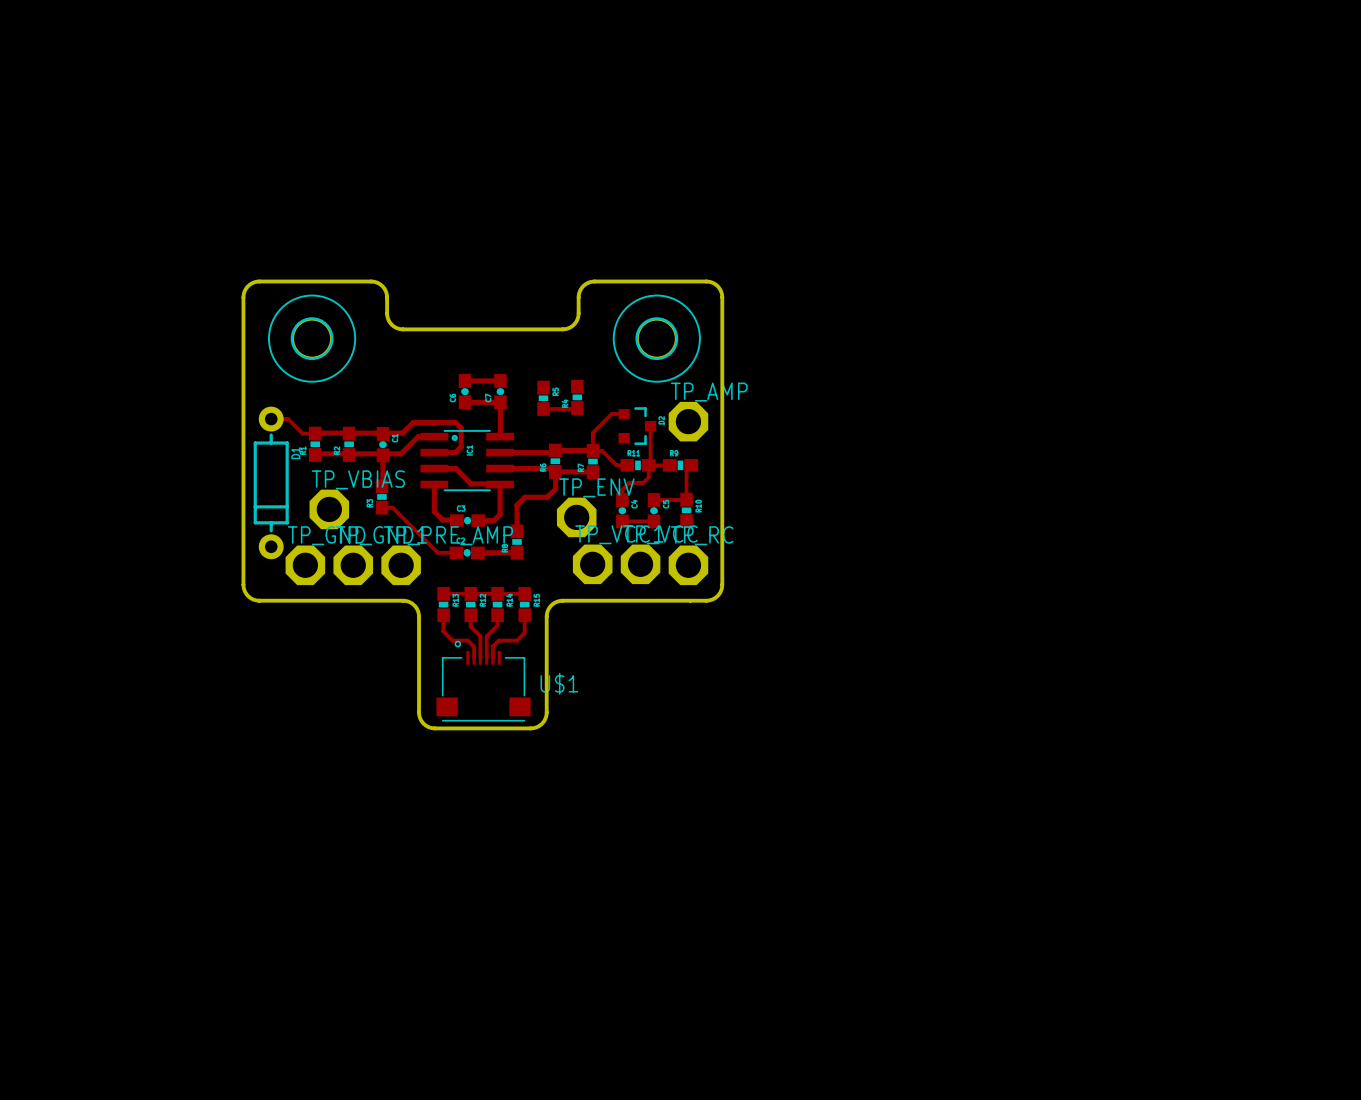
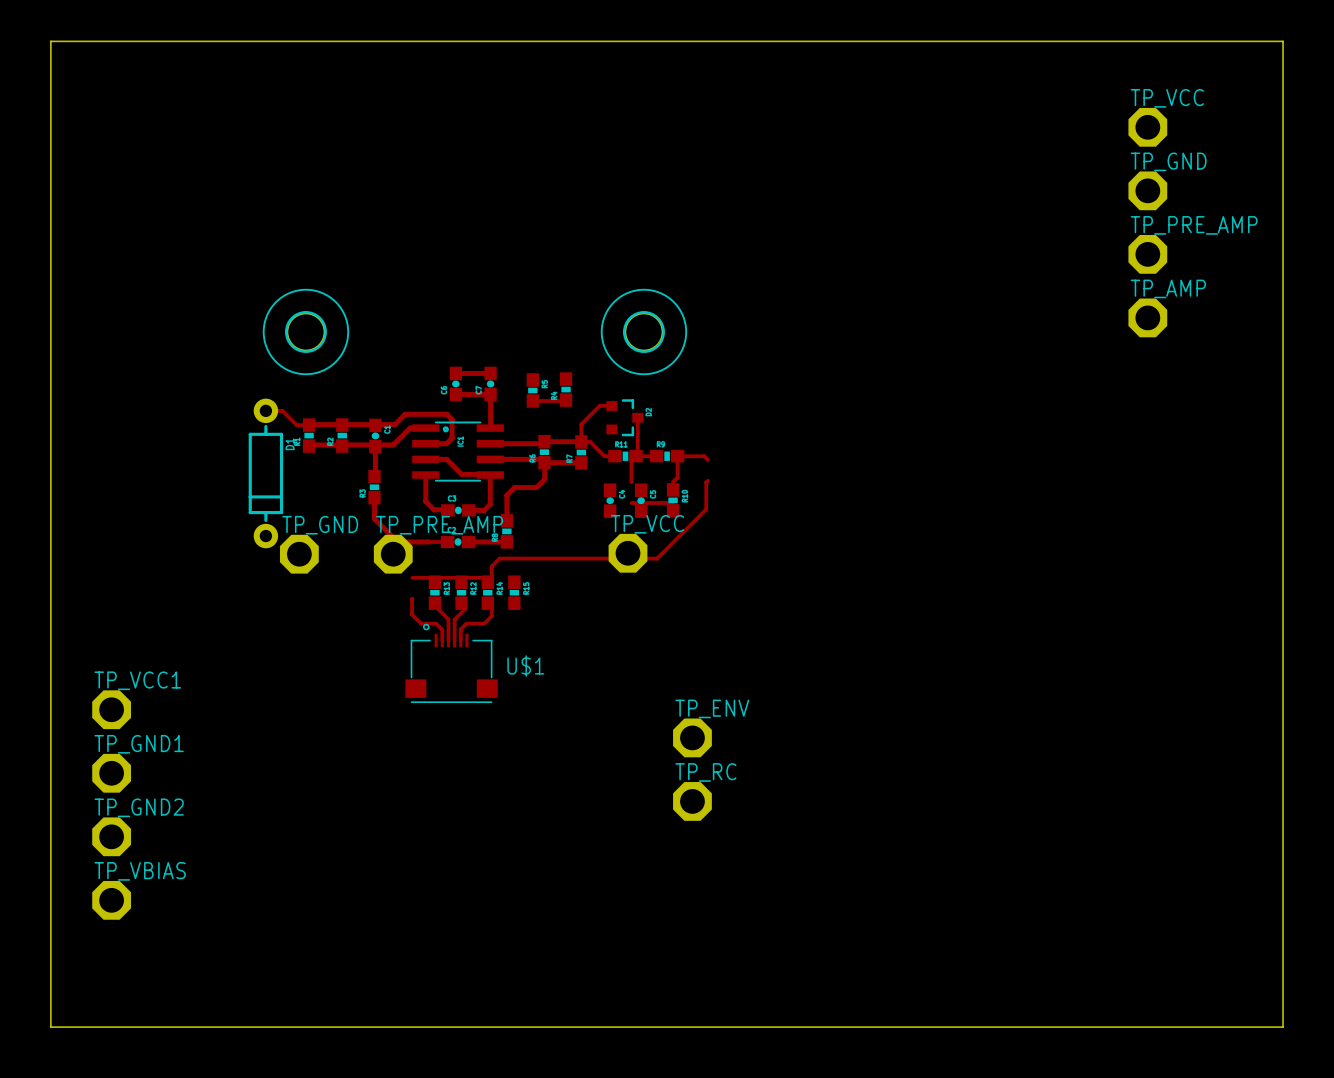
board edge: none -> (50, 41) (1283, 41) (1283, 1027) (50, 1027) (50, 41)
TP_VCC: none -> (1147, 127)
TP_GND: none -> (1147, 190)
TP_PRE_AMP: none -> (1147, 254)
board edge: (259, 281) (375, 282) (380, 284) (385, 291) (389, 321) (395, 327) (403, 329) (564, 329) (570, 327) (576, 321) (579, 291) (584, 284) (590, 282) (706, 281) (716, 284) (720, 289) (722, 297) (722, 584) (718, 594) (714, 598) (706, 600) (556, 601) (550, 606) (546, 614) (546, 712) (542, 723) (530, 728) (434, 728) (425, 725) (419, 714) (419, 616) (416, 608) (412, 604) (403, 600) (257, 600) (249, 597) (244, 590) (243, 297) (248, 286) (259, 281) -> none
TP_AMP: none -> (1147, 317)
TP_AMP: (688, 421) -> none
top track: (648, 465) (648, 477) (643, 482) (629, 482) (622, 489) (622, 500) -> (635, 456) (631, 460) (631, 482)
top track: (691, 465) (686, 469) (686, 500) (653, 500) -> none
top track: none -> (707, 459) (704, 456) (677, 456) (677, 477) (673, 482)
top track: none -> (707, 480) (706, 509) (657, 558) (499, 558) (491, 566) (491, 577) (412, 577)
top track: (381, 507) (392, 507) (437, 552) -> (374, 497) (374, 518) (397, 541) (429, 541)
TP_VBIAS: (329, 509) -> none
top track: none -> (631, 503) (673, 503)
TP_ENV position: (576, 517) -> (692, 737)
top track: (622, 521) (653, 521) -> none
TP_VCC1 position: (592, 564) -> (111, 709)
TP_GND1 position: (353, 565) -> (111, 773)
TP_RC position: (688, 565) -> (692, 801)
top track: (443, 593) (524, 593) -> none
top track: (443, 615) (443, 631) (452, 640) (467, 640) (474, 646) (474, 657) -> (412, 598) (412, 614) (421, 623) (436, 623) (442, 629) (442, 640)
top track: (470, 615) (470, 626) (480, 636) (480, 657) -> (438, 598) (438, 609) (448, 619) (448, 640)
top track: (497, 615) (497, 625) (486, 636) (486, 657) -> (465, 598) (465, 608) (454, 619) (454, 640)
top track: (524, 615) (524, 632) (517, 640) (498, 640) (492, 646) (492, 657) -> (491, 598) (491, 616) (484, 623) (466, 623) (460, 629) (460, 640)
U$1 position: (483, 681) -> (451, 663)
TP_GND2: none -> (111, 836)
TP_VBIAS: none -> (111, 900)

